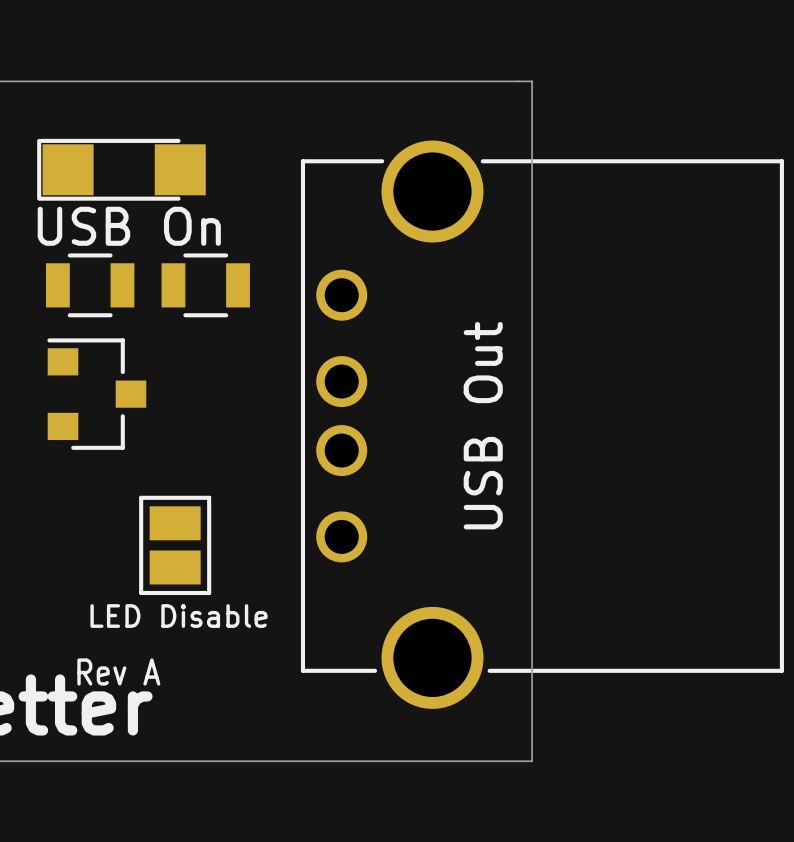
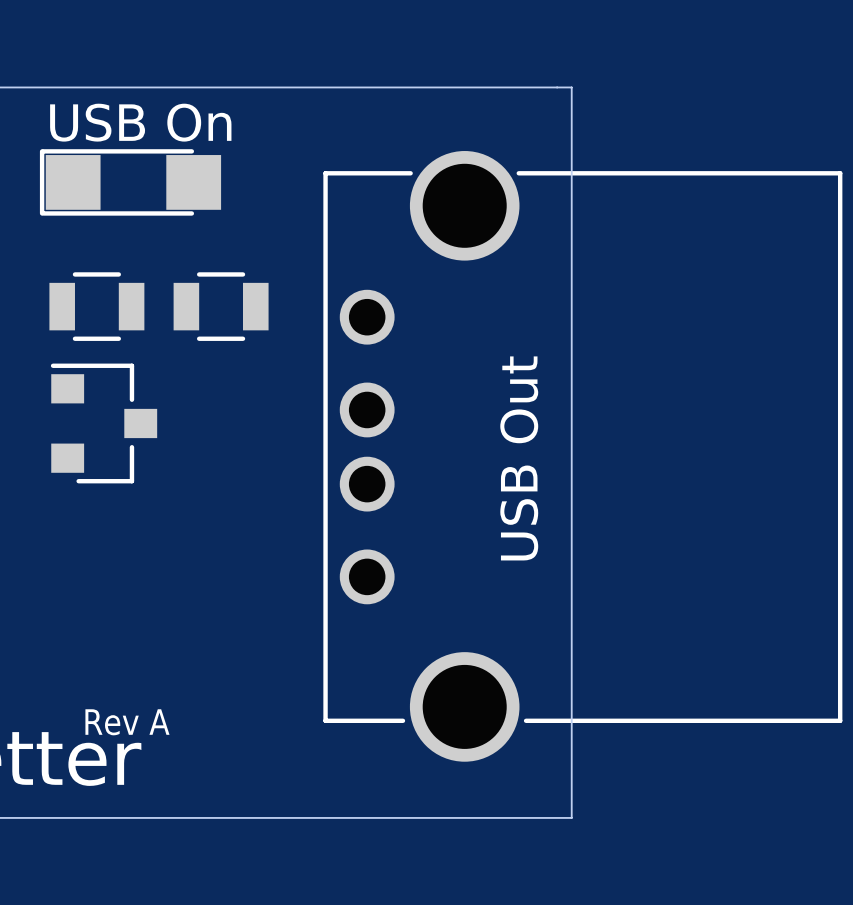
part value position: USB On (129, 226) -> USB On (140, 122)
part: LED Disable (175, 545) -> none

